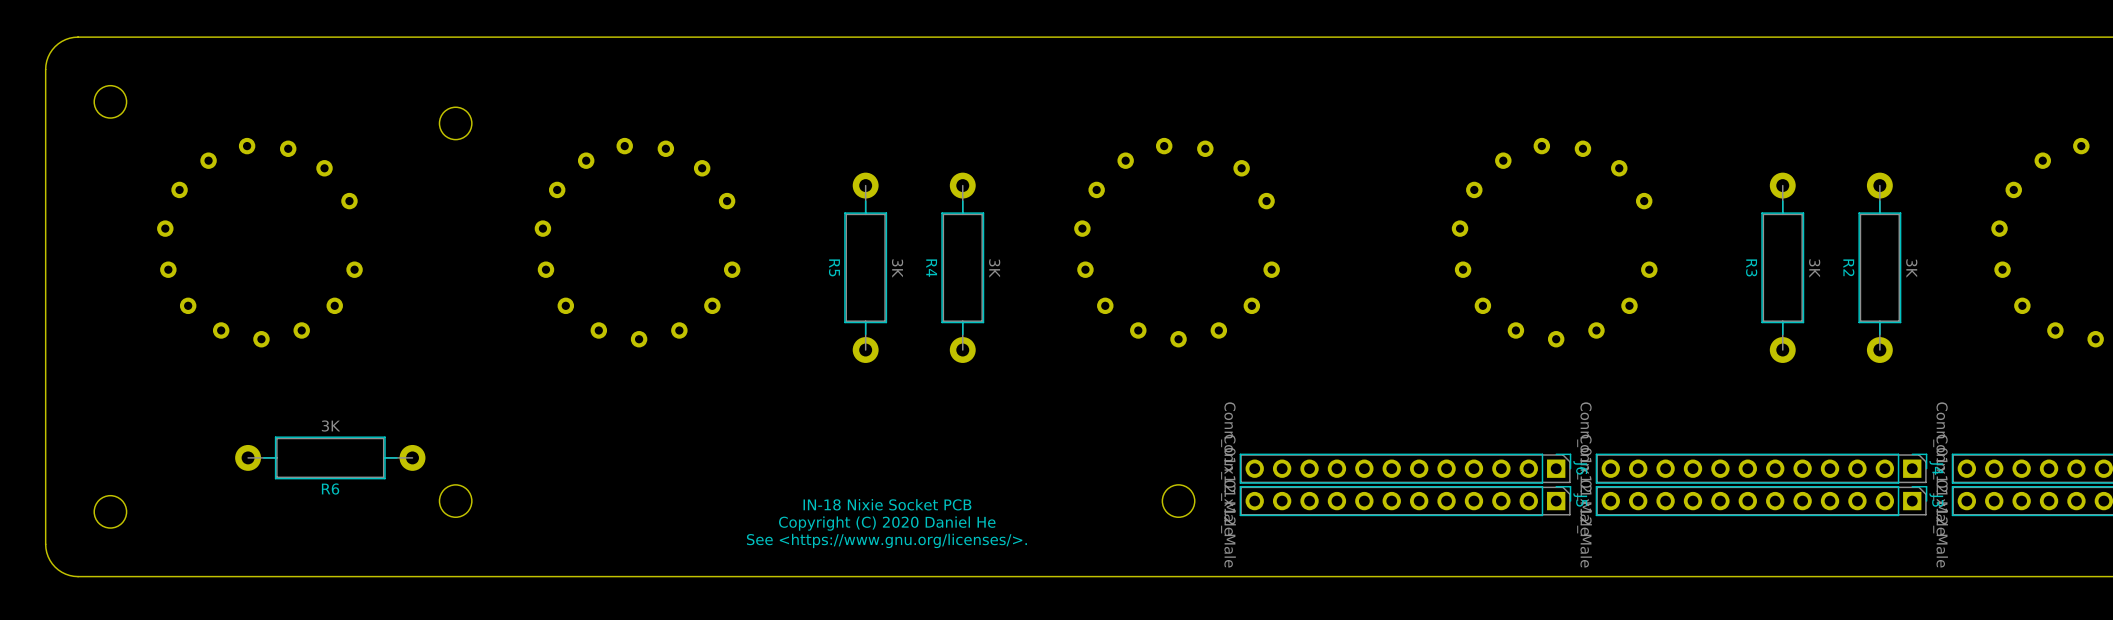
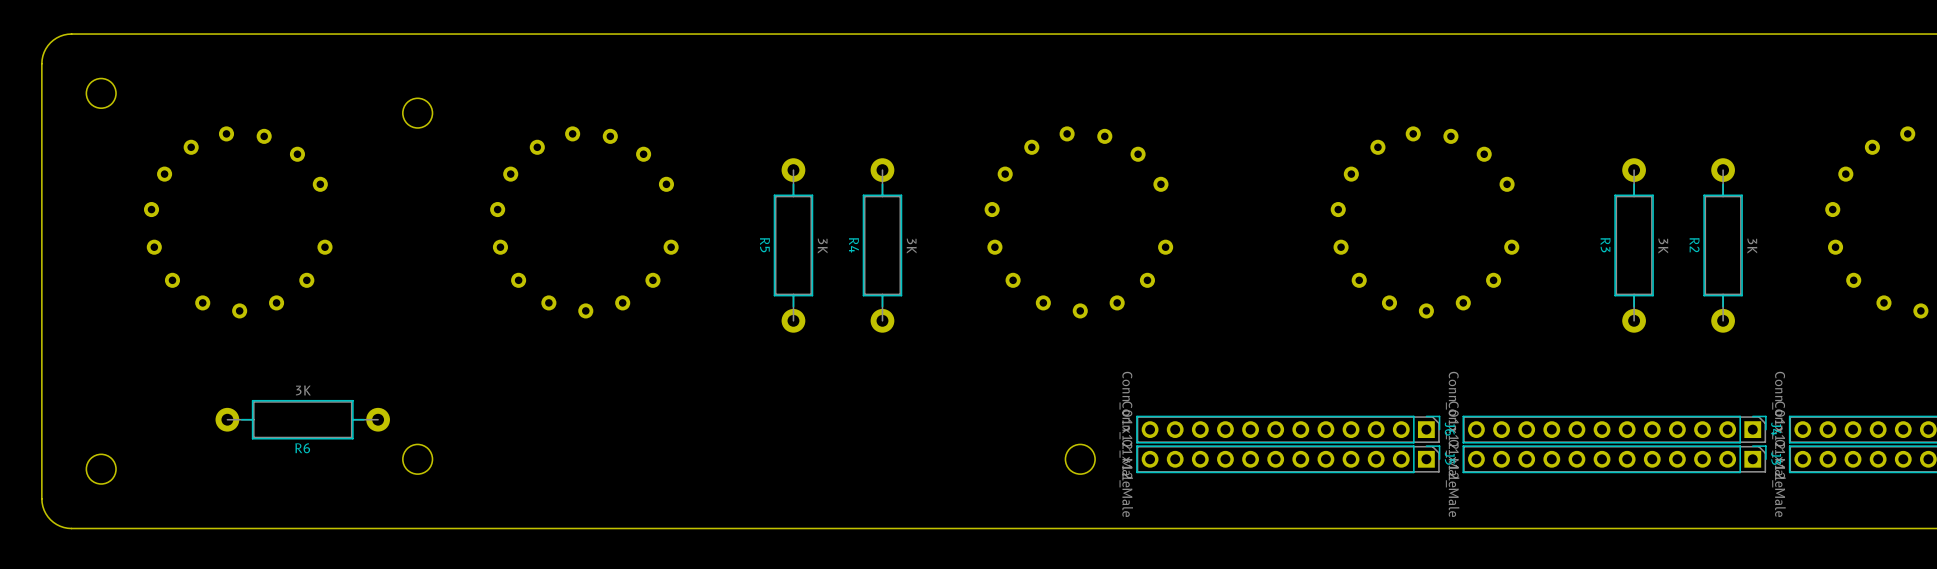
text: IN-18 Nixie Socket PCB (887, 504) -> none
text: Copyright (C) 2020 Daniel He (887, 523) -> none
text: See <https://www.gnu.org/licenses/>. (886, 540) -> none

